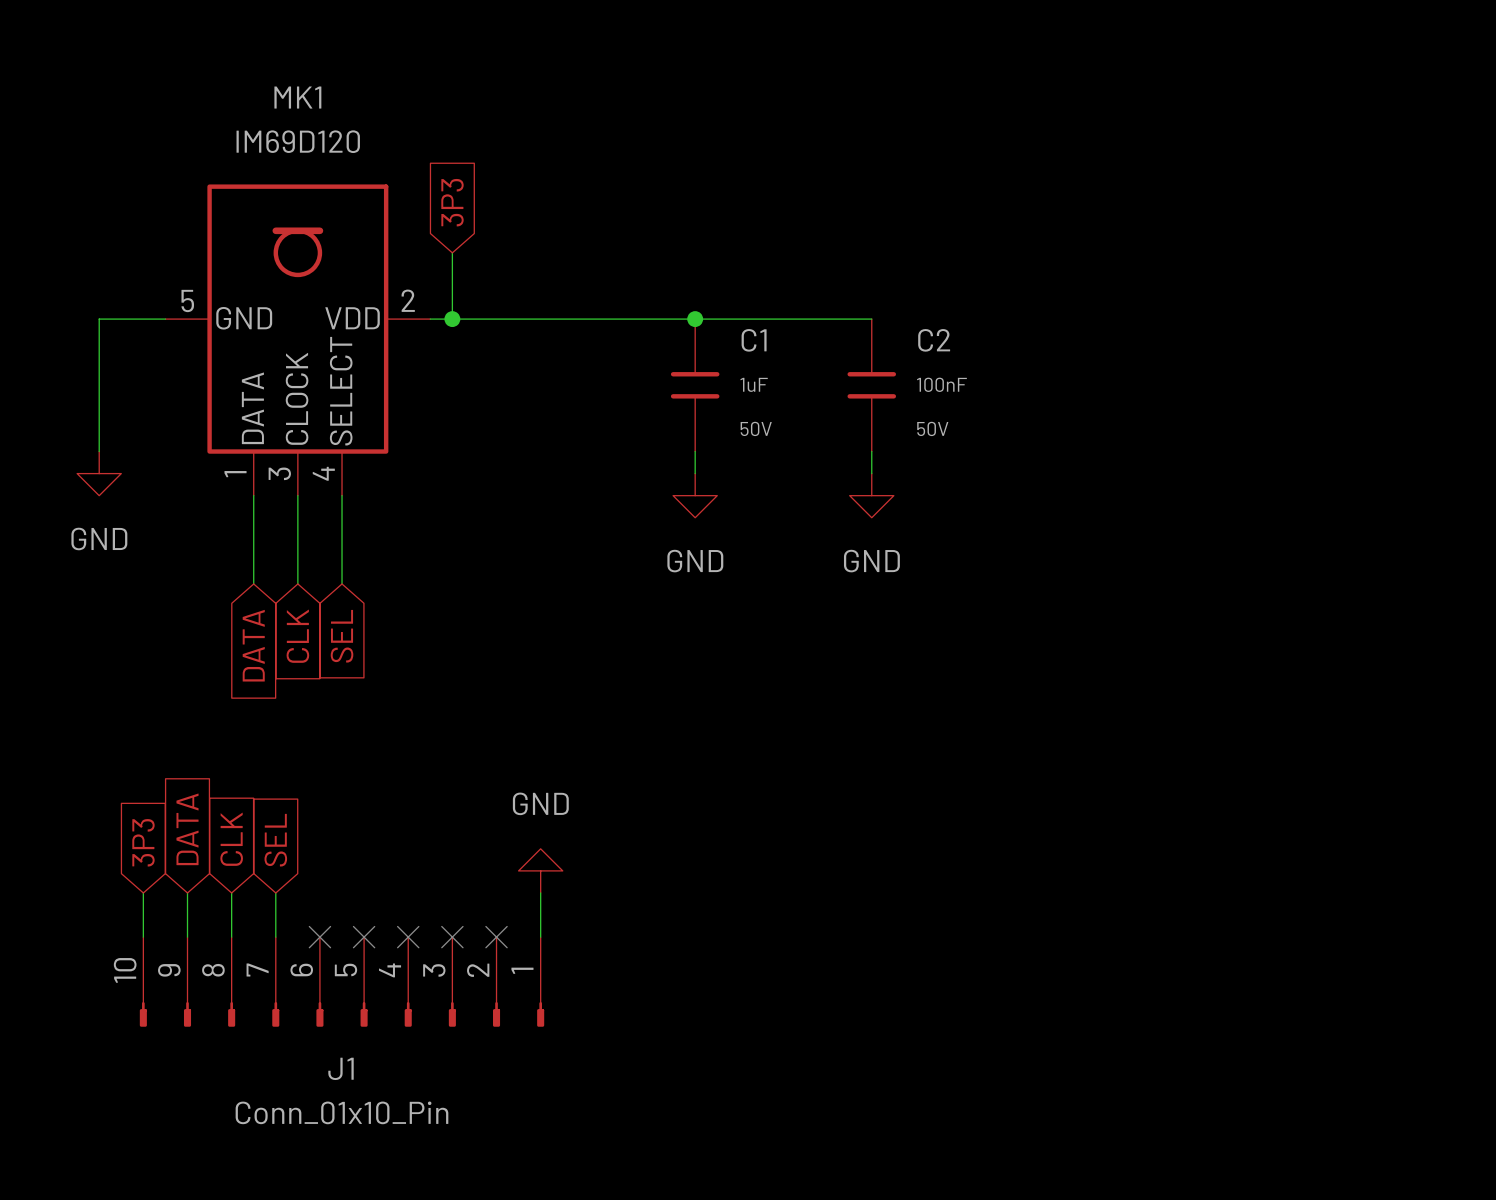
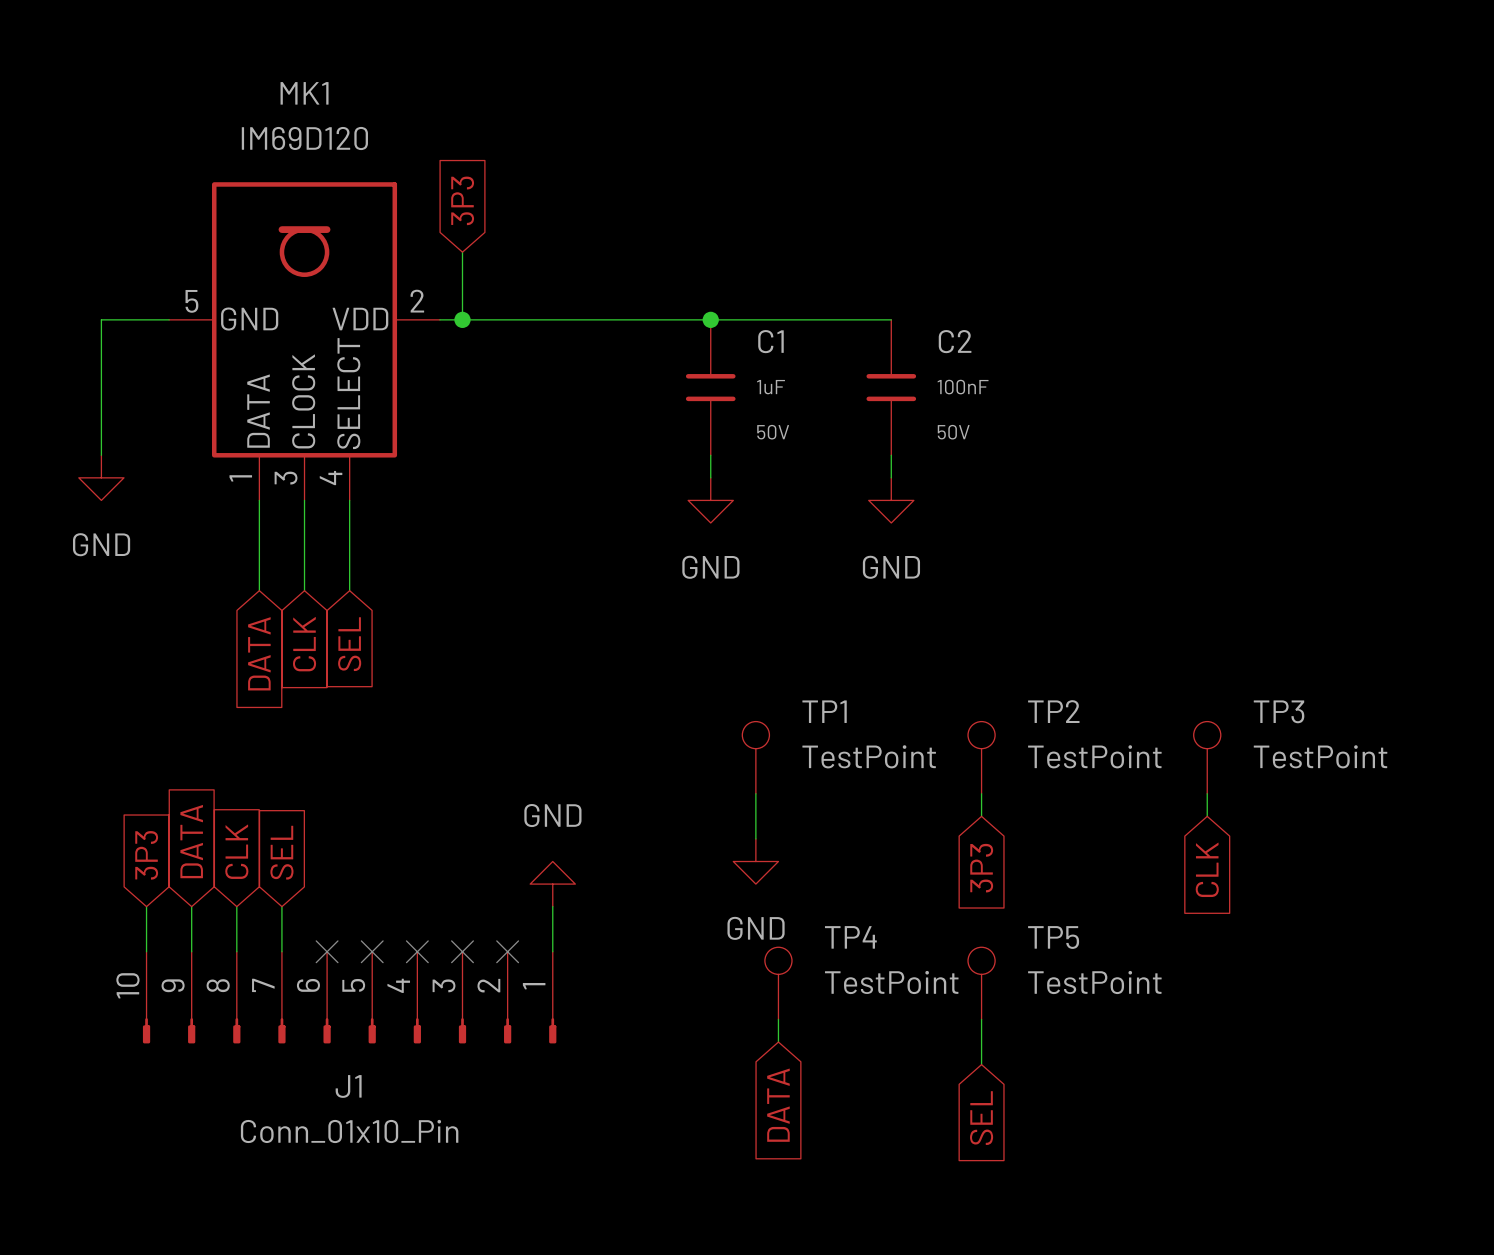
TP1: none -> TestPoint (755, 757)
TP2: none -> TestPoint (981, 757)
TP3: none -> TestPoint (1207, 757)
wire: none -> (755, 793) (755, 838)
wire: none -> (981, 793) (981, 816)
wire: none -> (1207, 793) (1207, 816)
power symbol: none -> GND (755, 861)
global label: none -> 3P3 (981, 868)
global label: none -> CLK (1207, 869)
TP4: none -> TestPoint (778, 983)
TP5: none -> TestPoint (981, 983)
wire: none -> (778, 1019) (778, 1042)
wire: none -> (981, 1019) (981, 1064)
global label: none -> DATA (778, 1105)
global label: none -> SEL (981, 1118)

